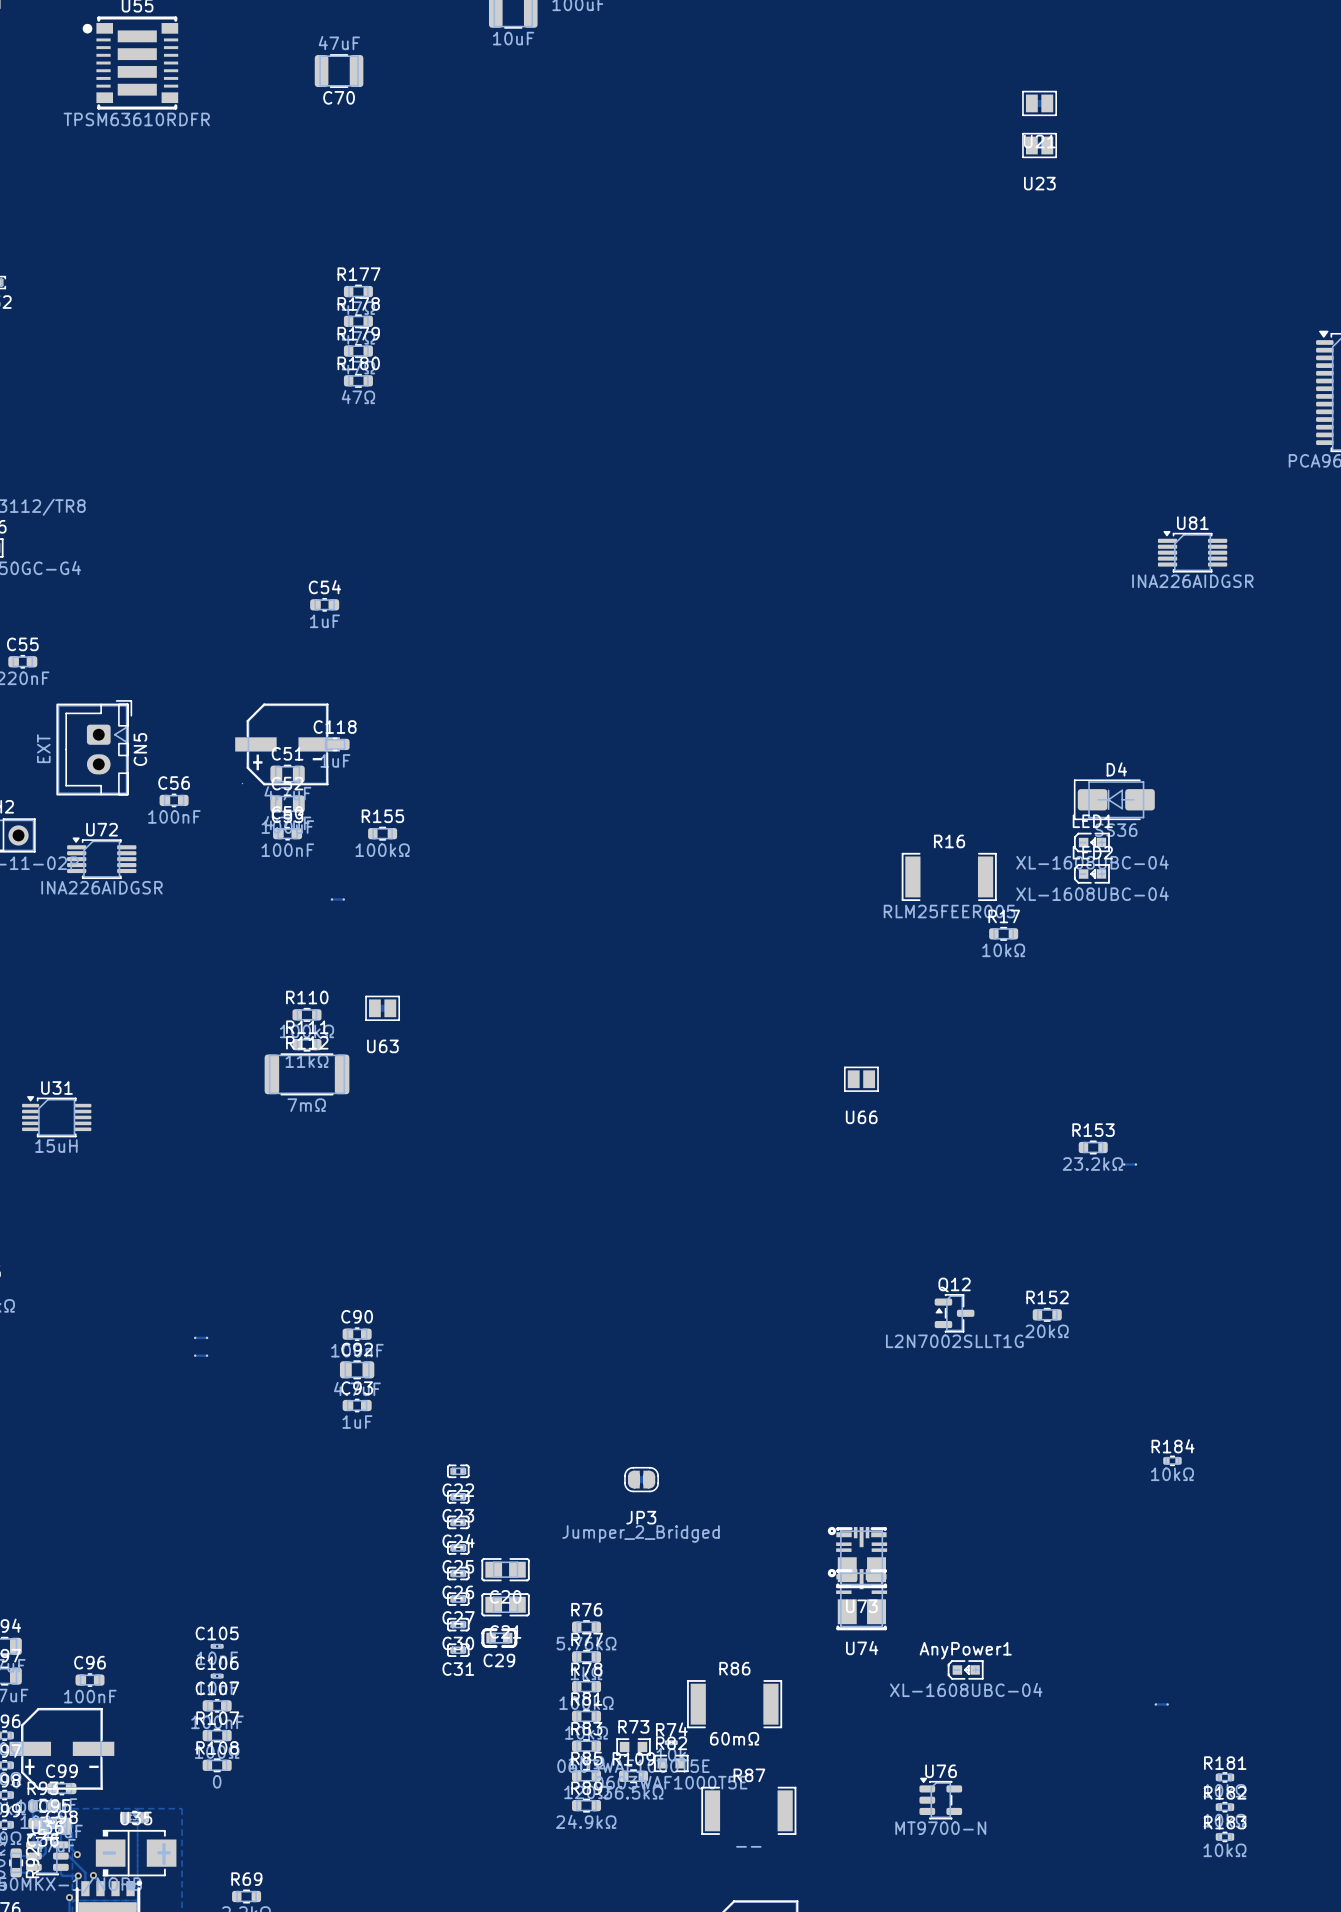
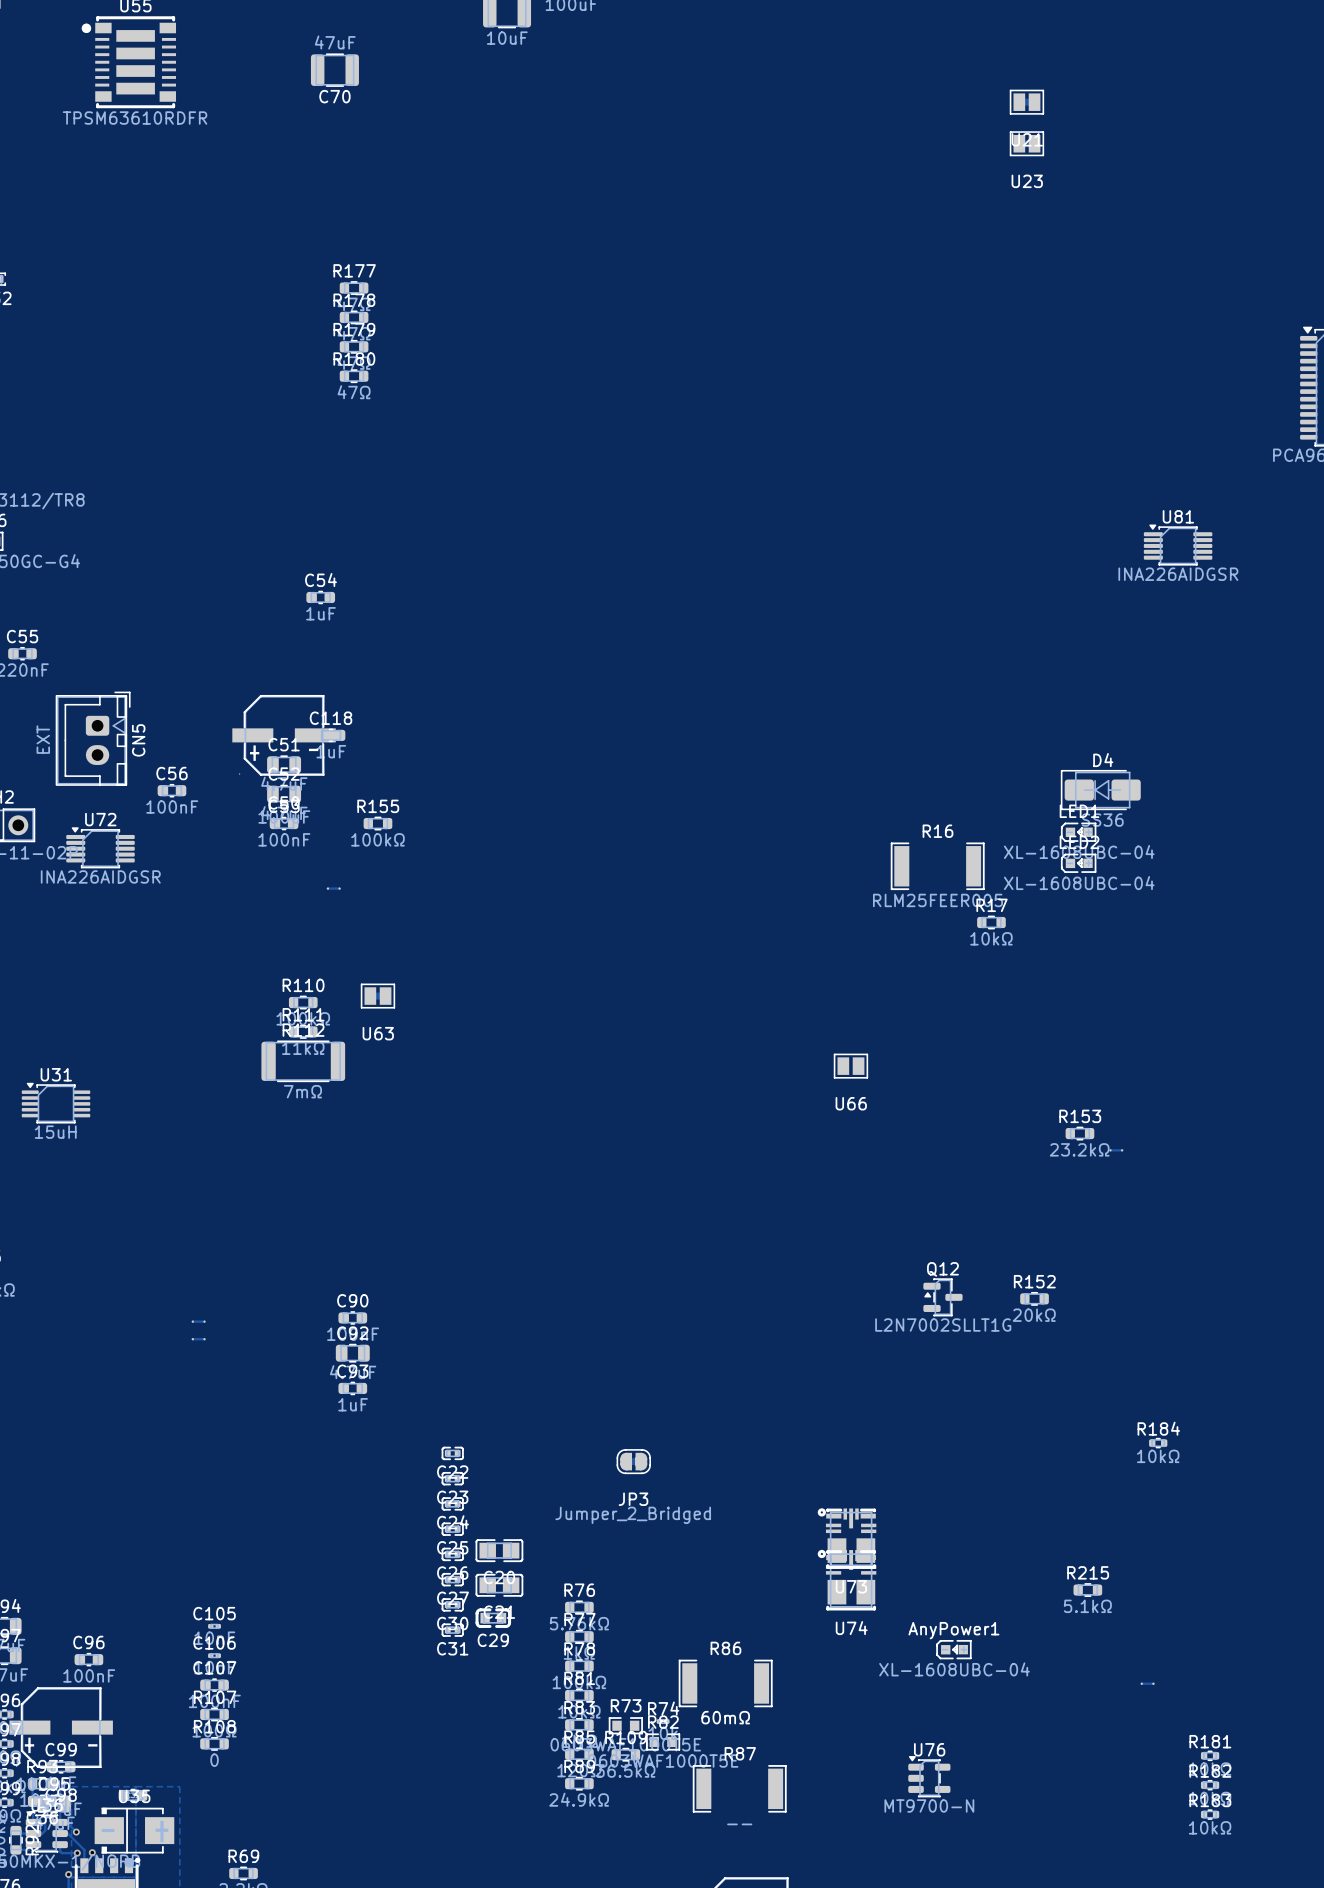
R215: none -> 5.1kΩ (1087, 1590)

